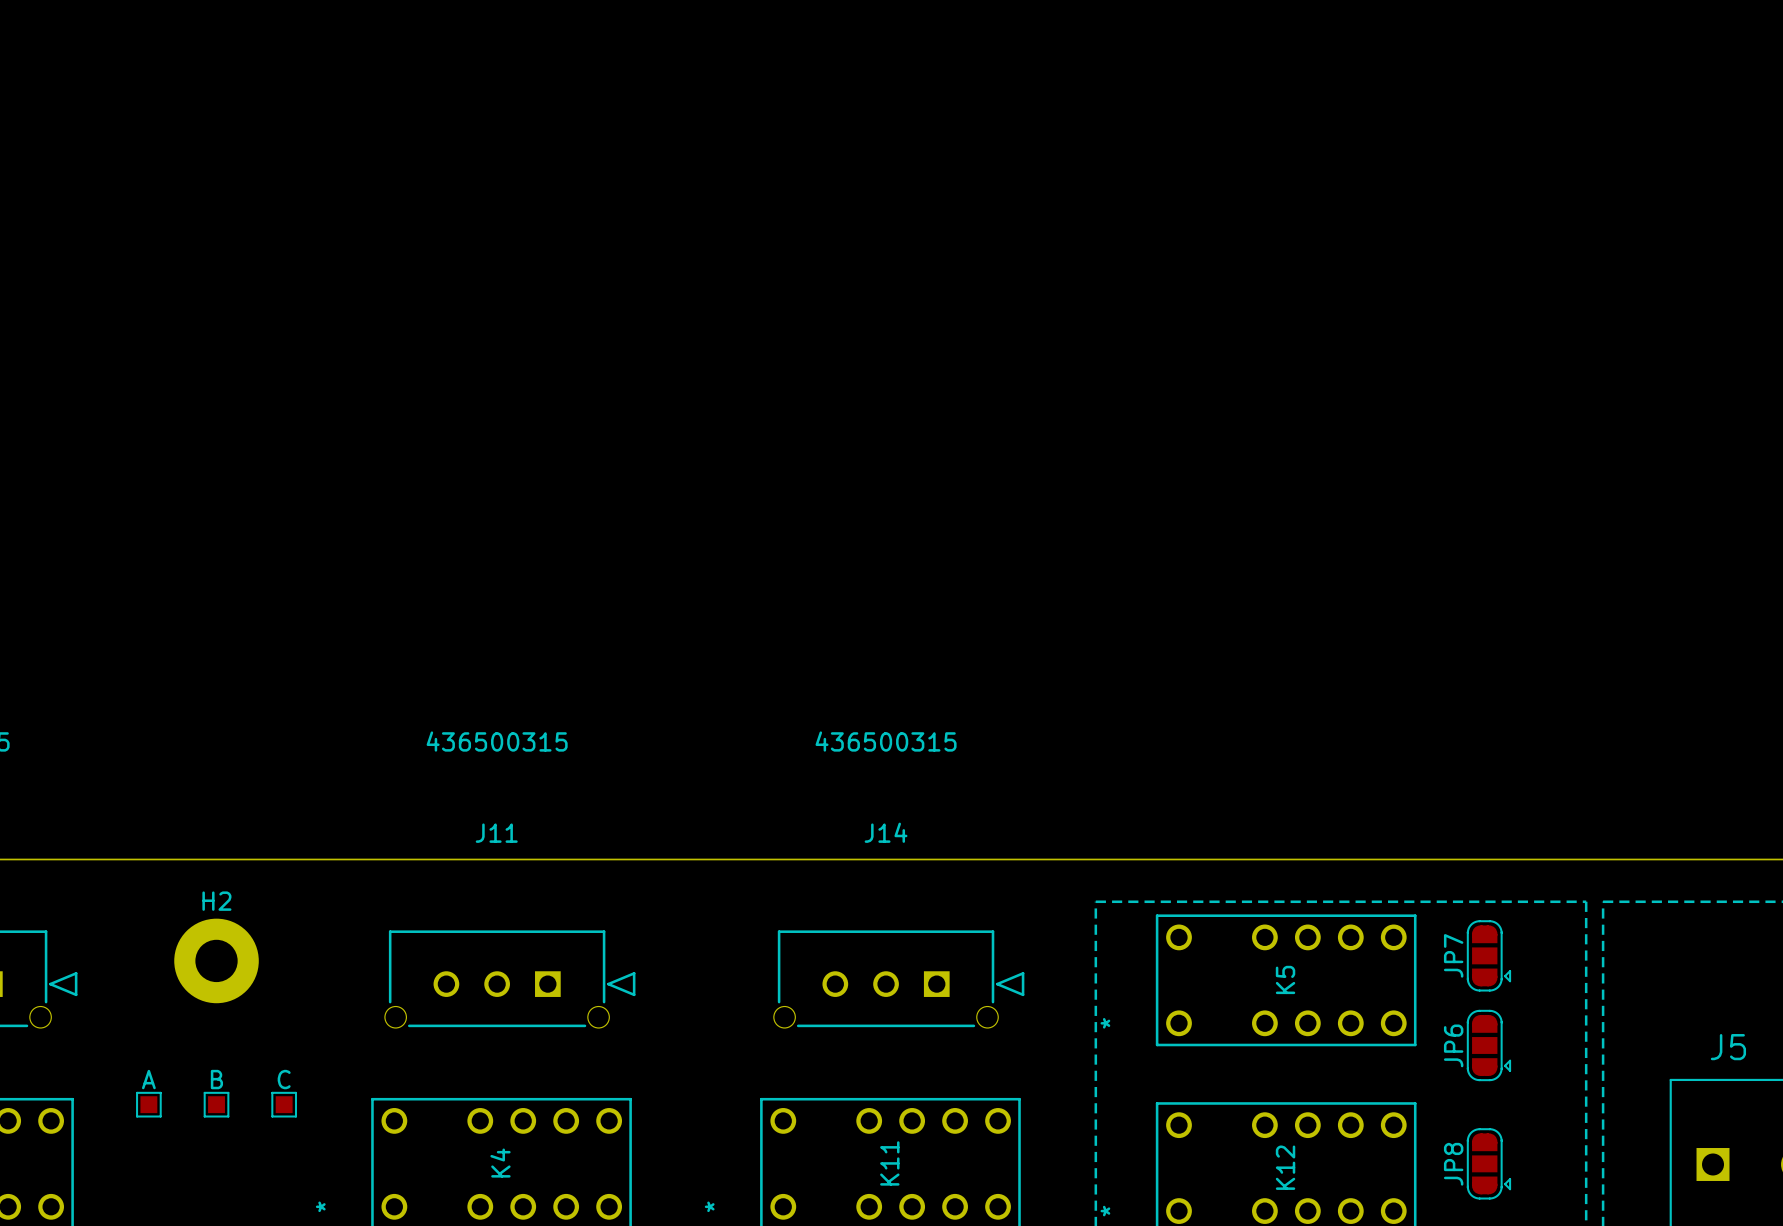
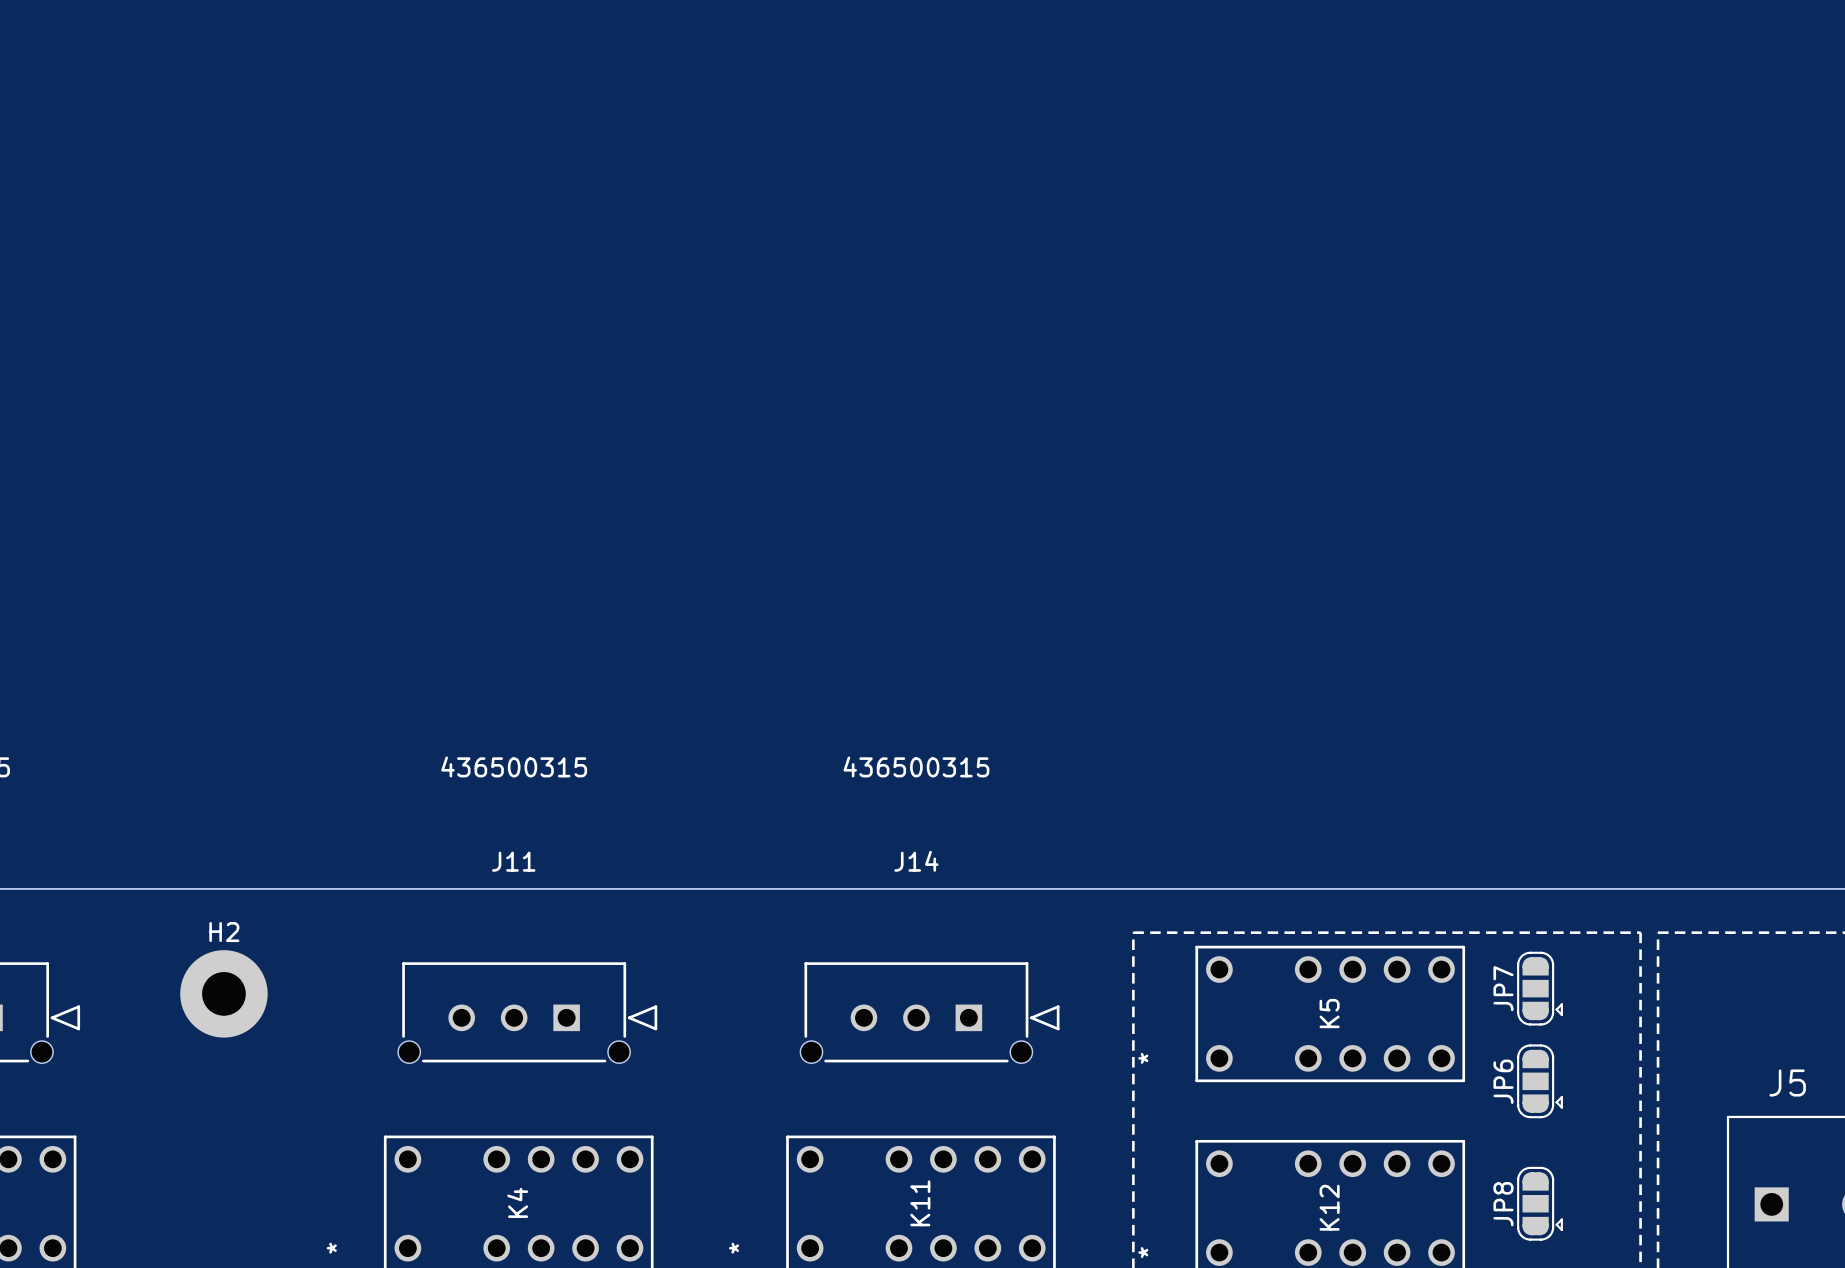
A: (148, 1104) -> none
B: (216, 1104) -> none
C: (284, 1104) -> none

